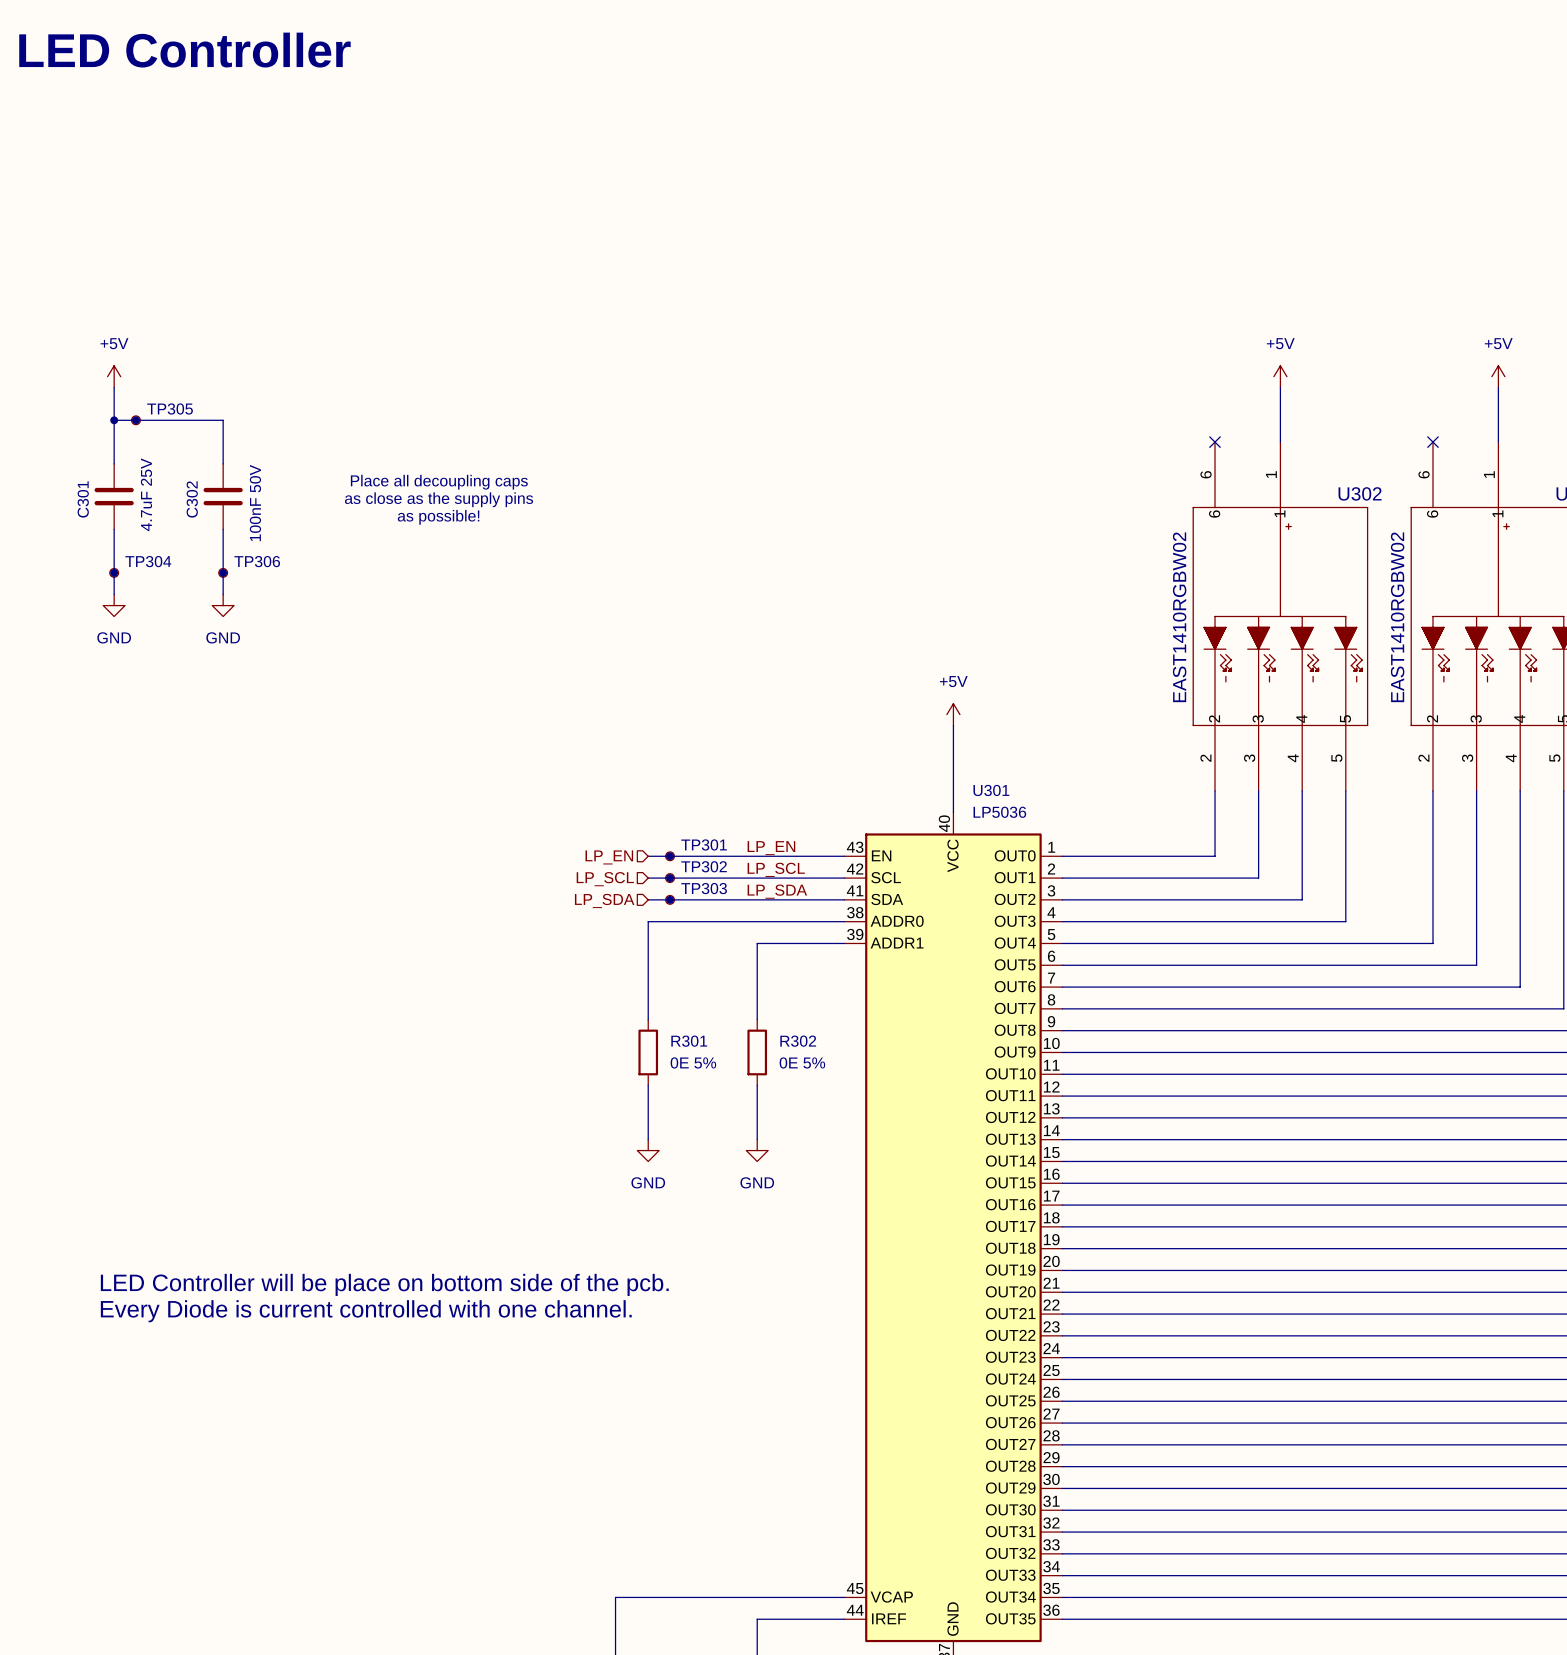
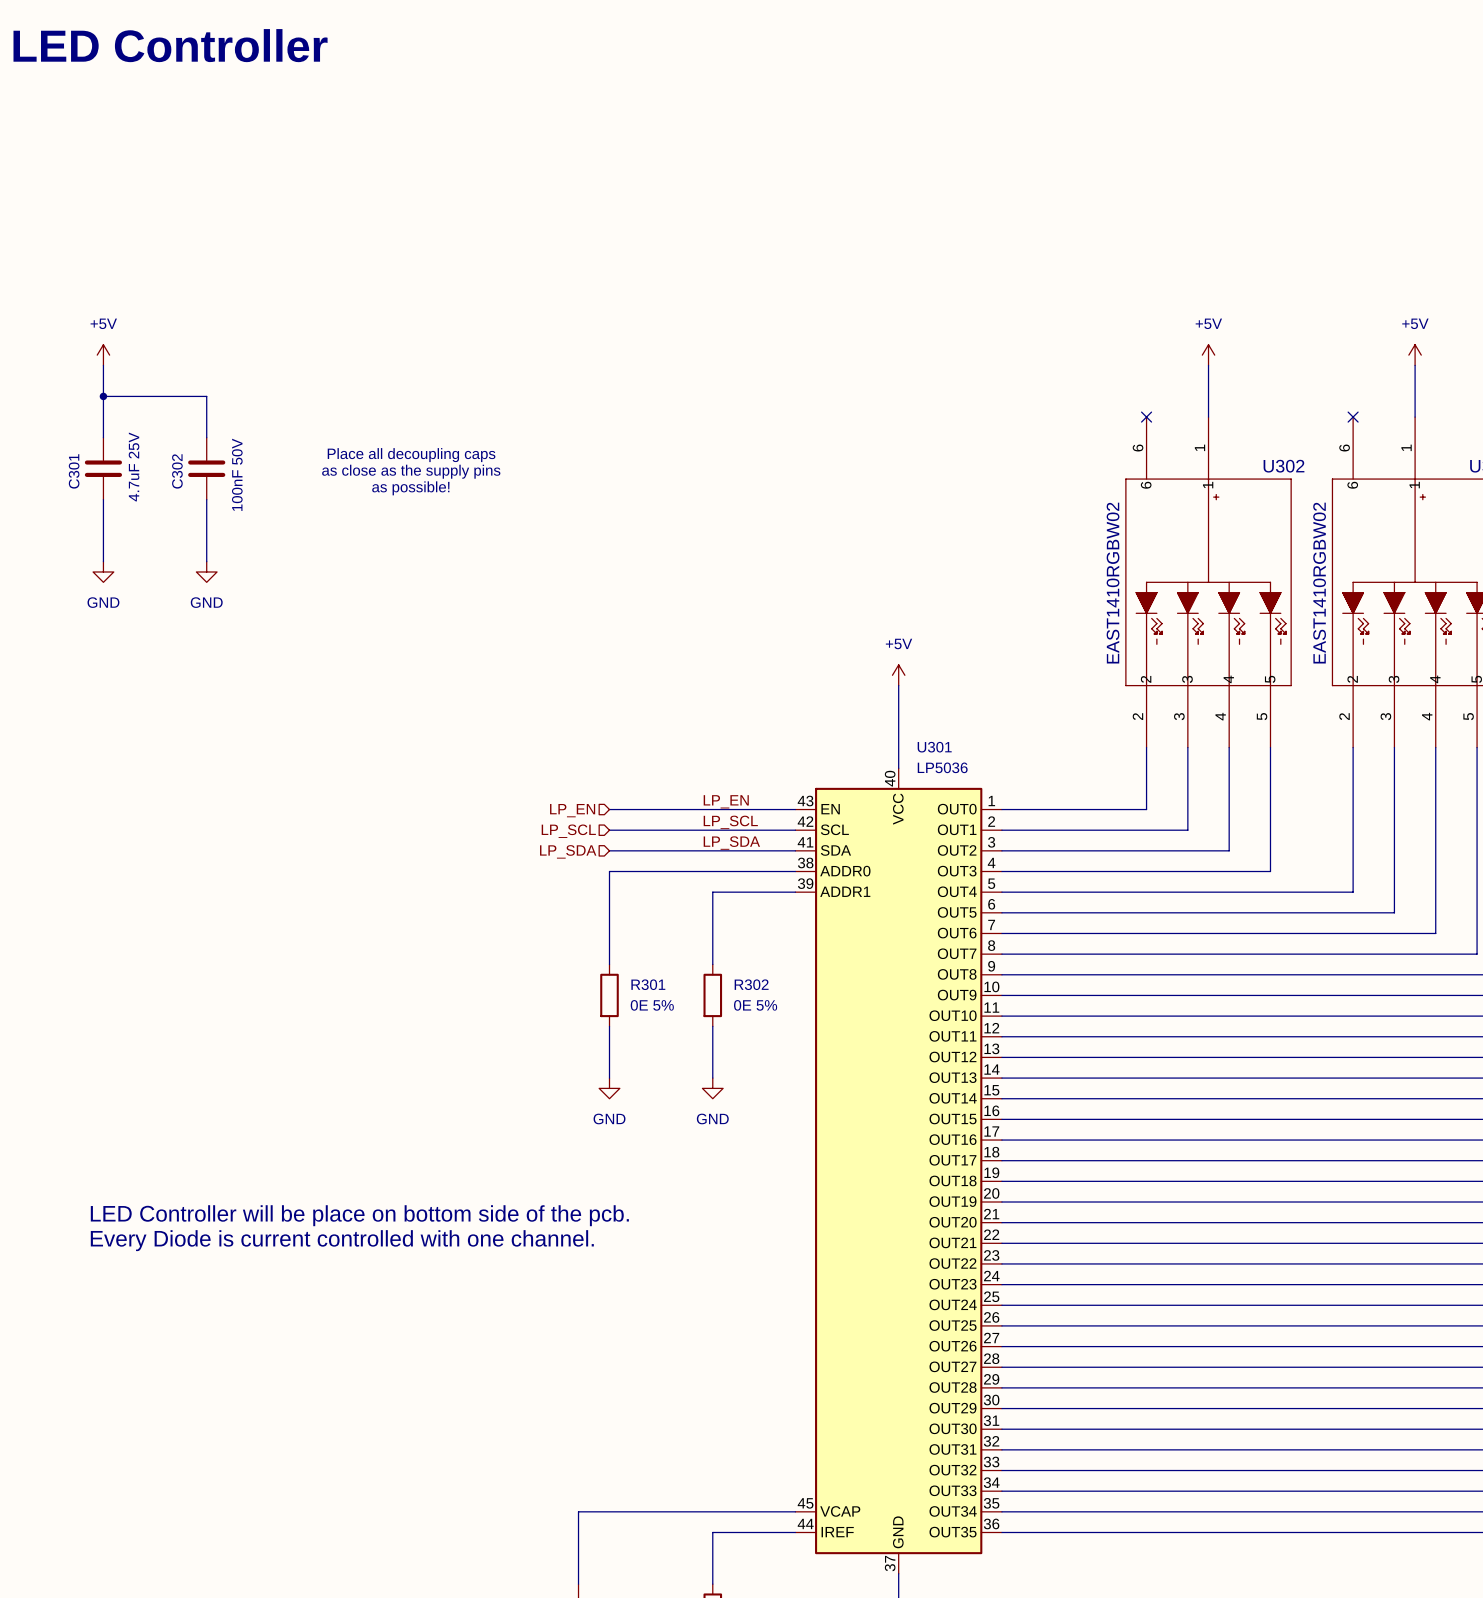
junction: (135, 420) -> none
TP305: (135, 420) -> none
junction: (114, 572) -> none
TP304: (114, 572) -> none
junction: (223, 572) -> none
TP306: (223, 572) -> none
junction: (670, 856) -> none
TP301: (670, 856) -> none
junction: (670, 878) -> none
TP302: (670, 878) -> none
junction: (670, 899) -> none
TP303: (670, 899) -> none

